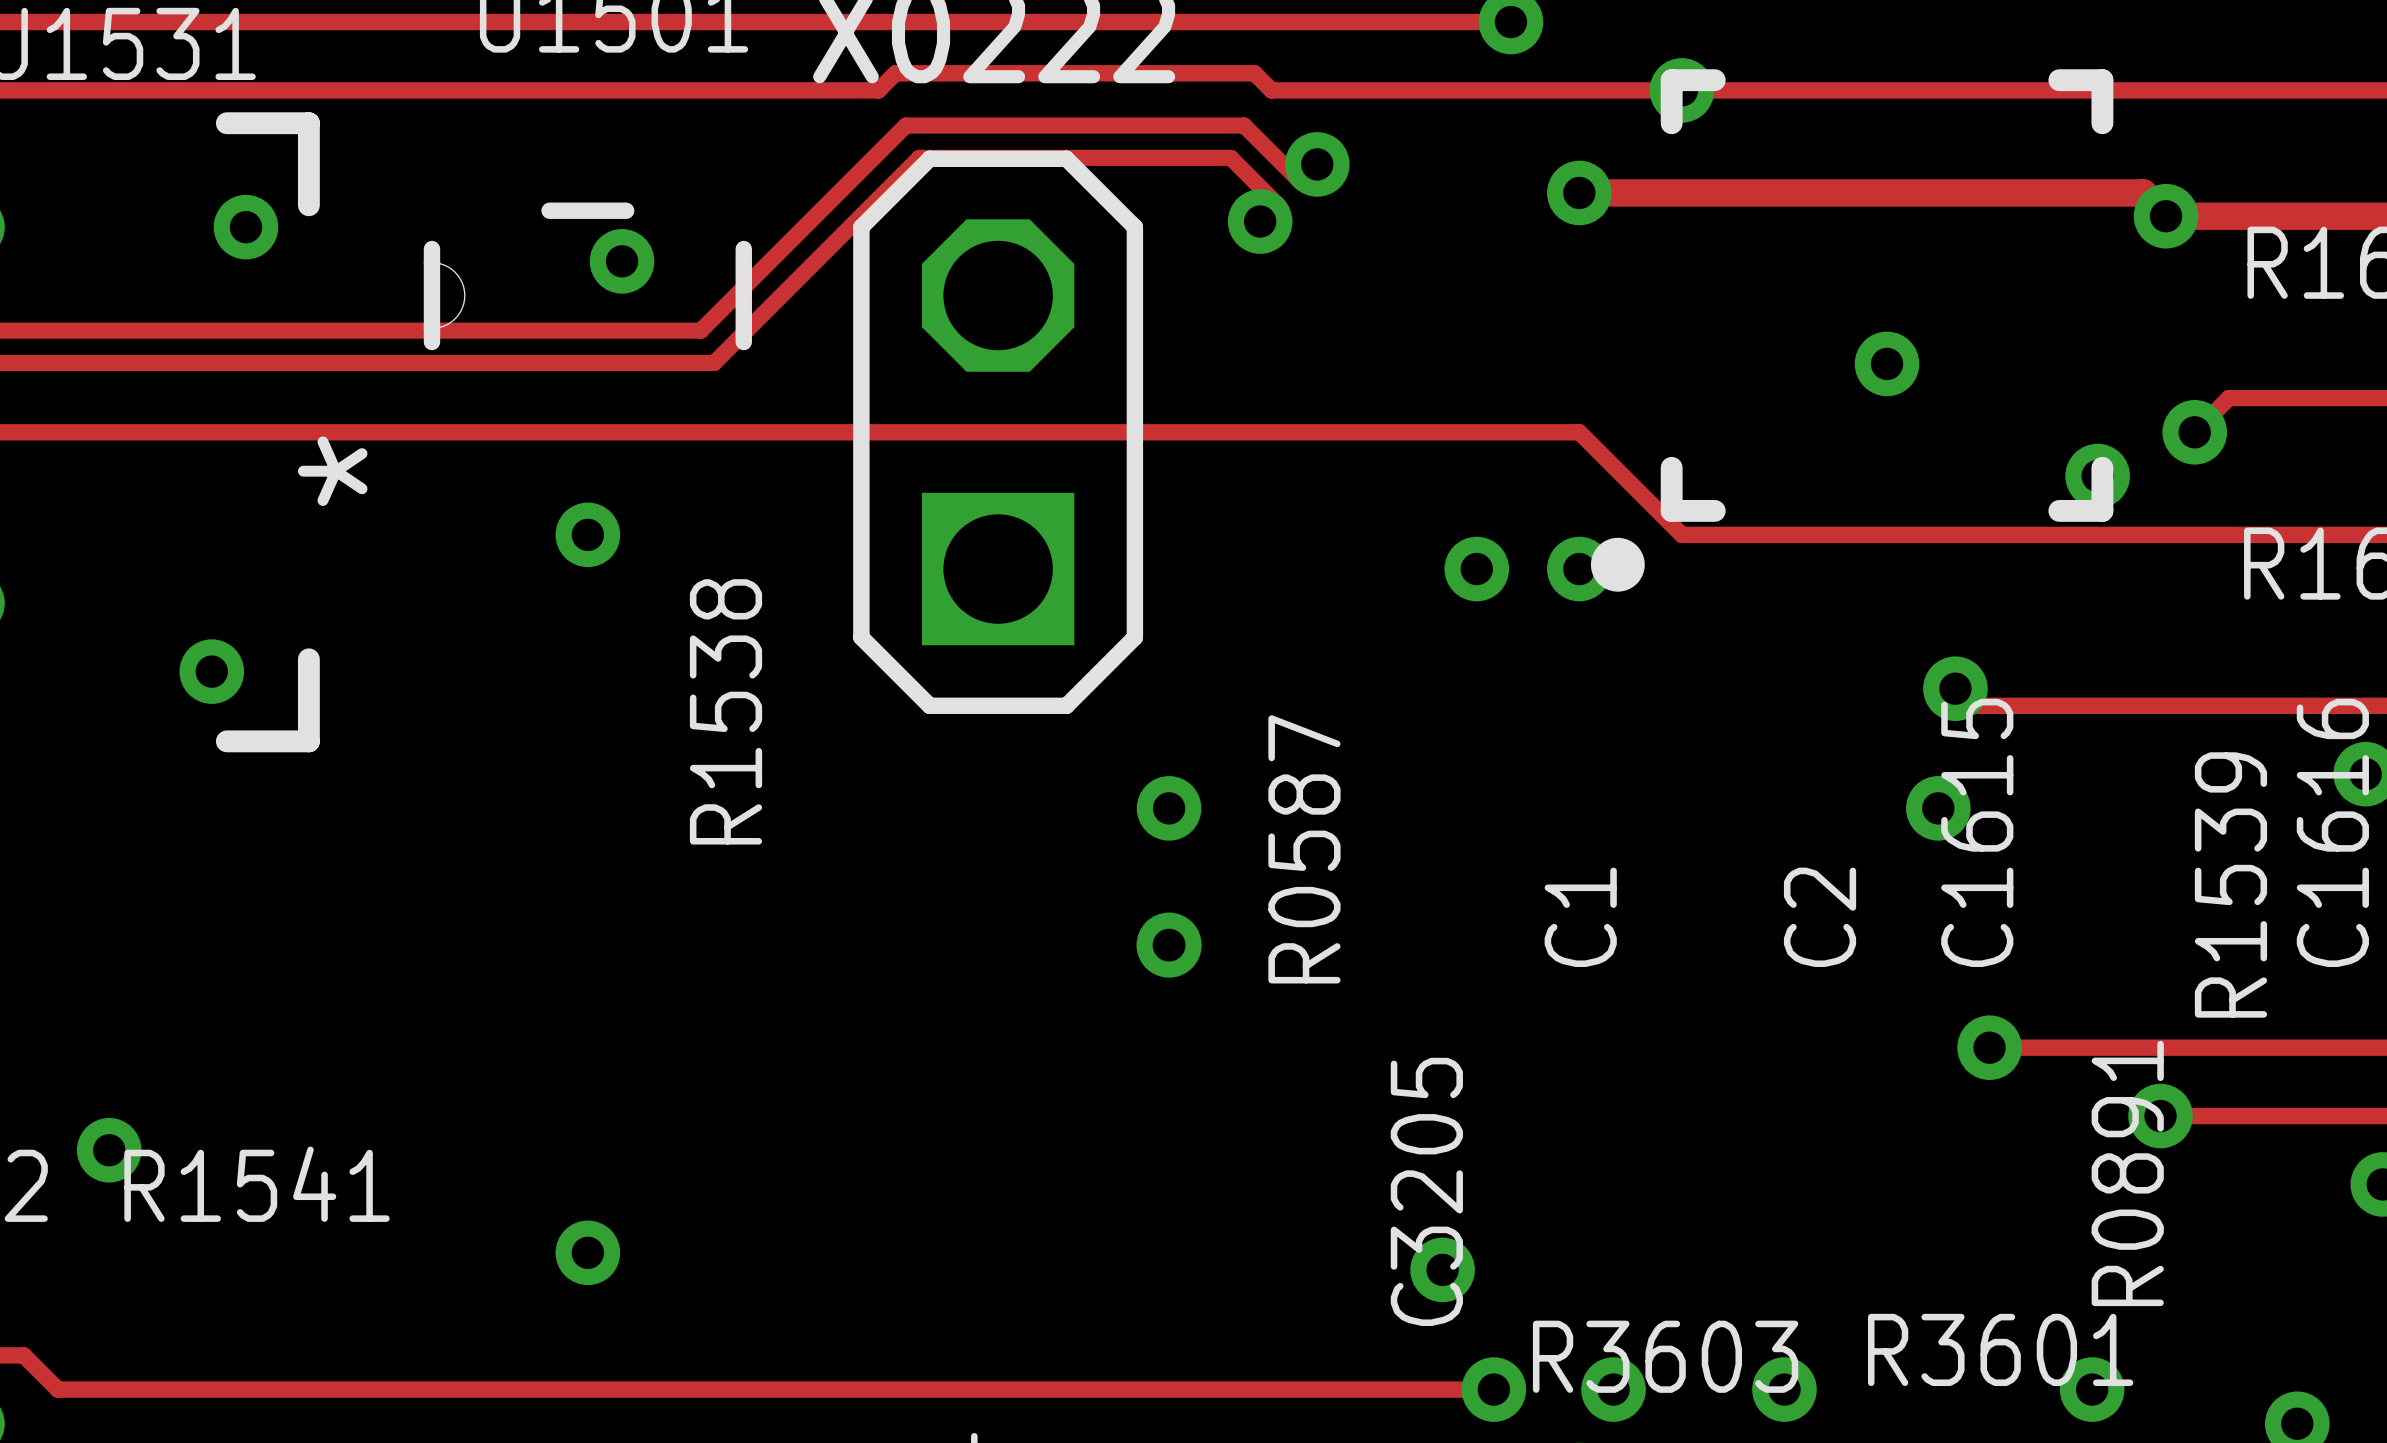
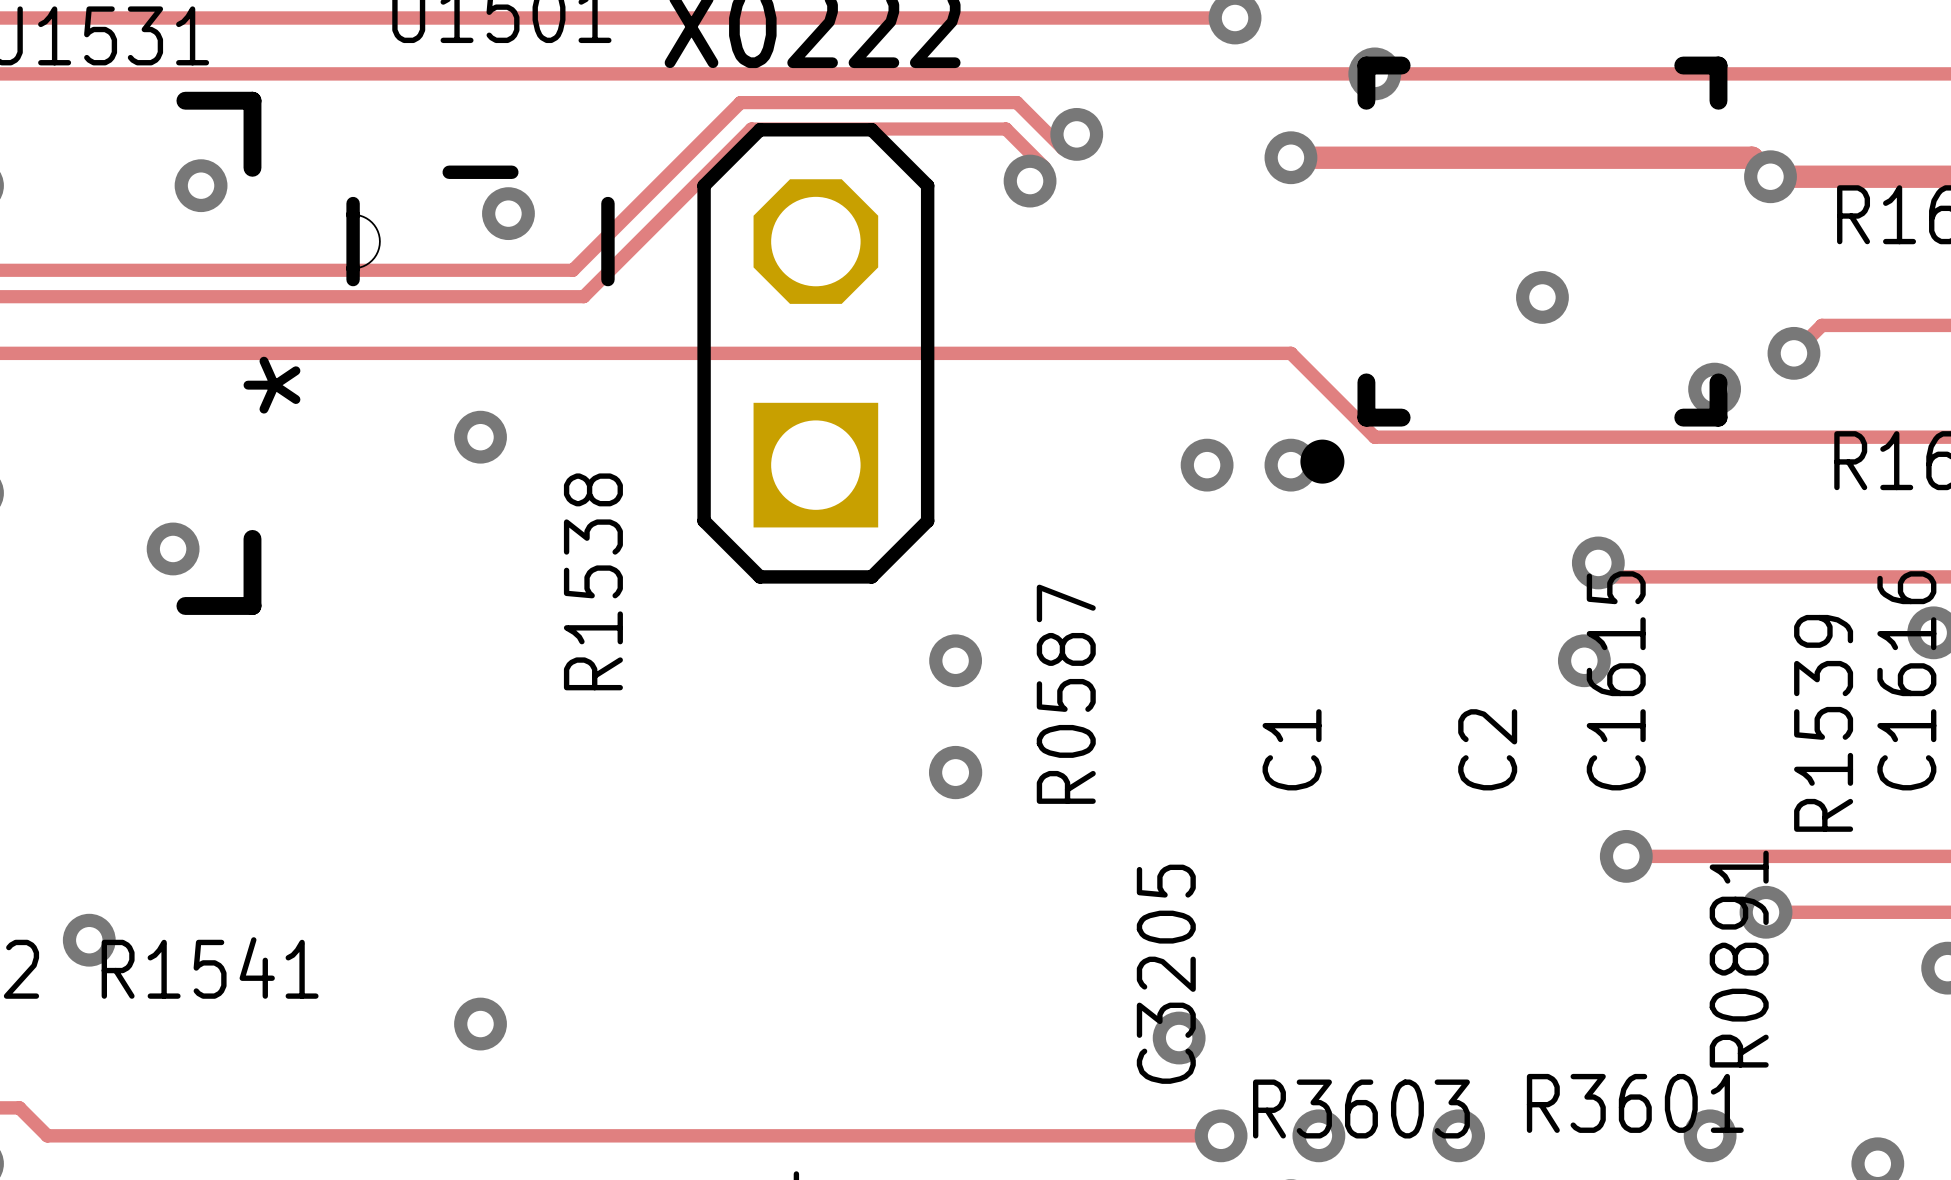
track: (878, 90) (895, 73) (1254, 73) (1271, 90) -> (718, 73) (1039, 73)

